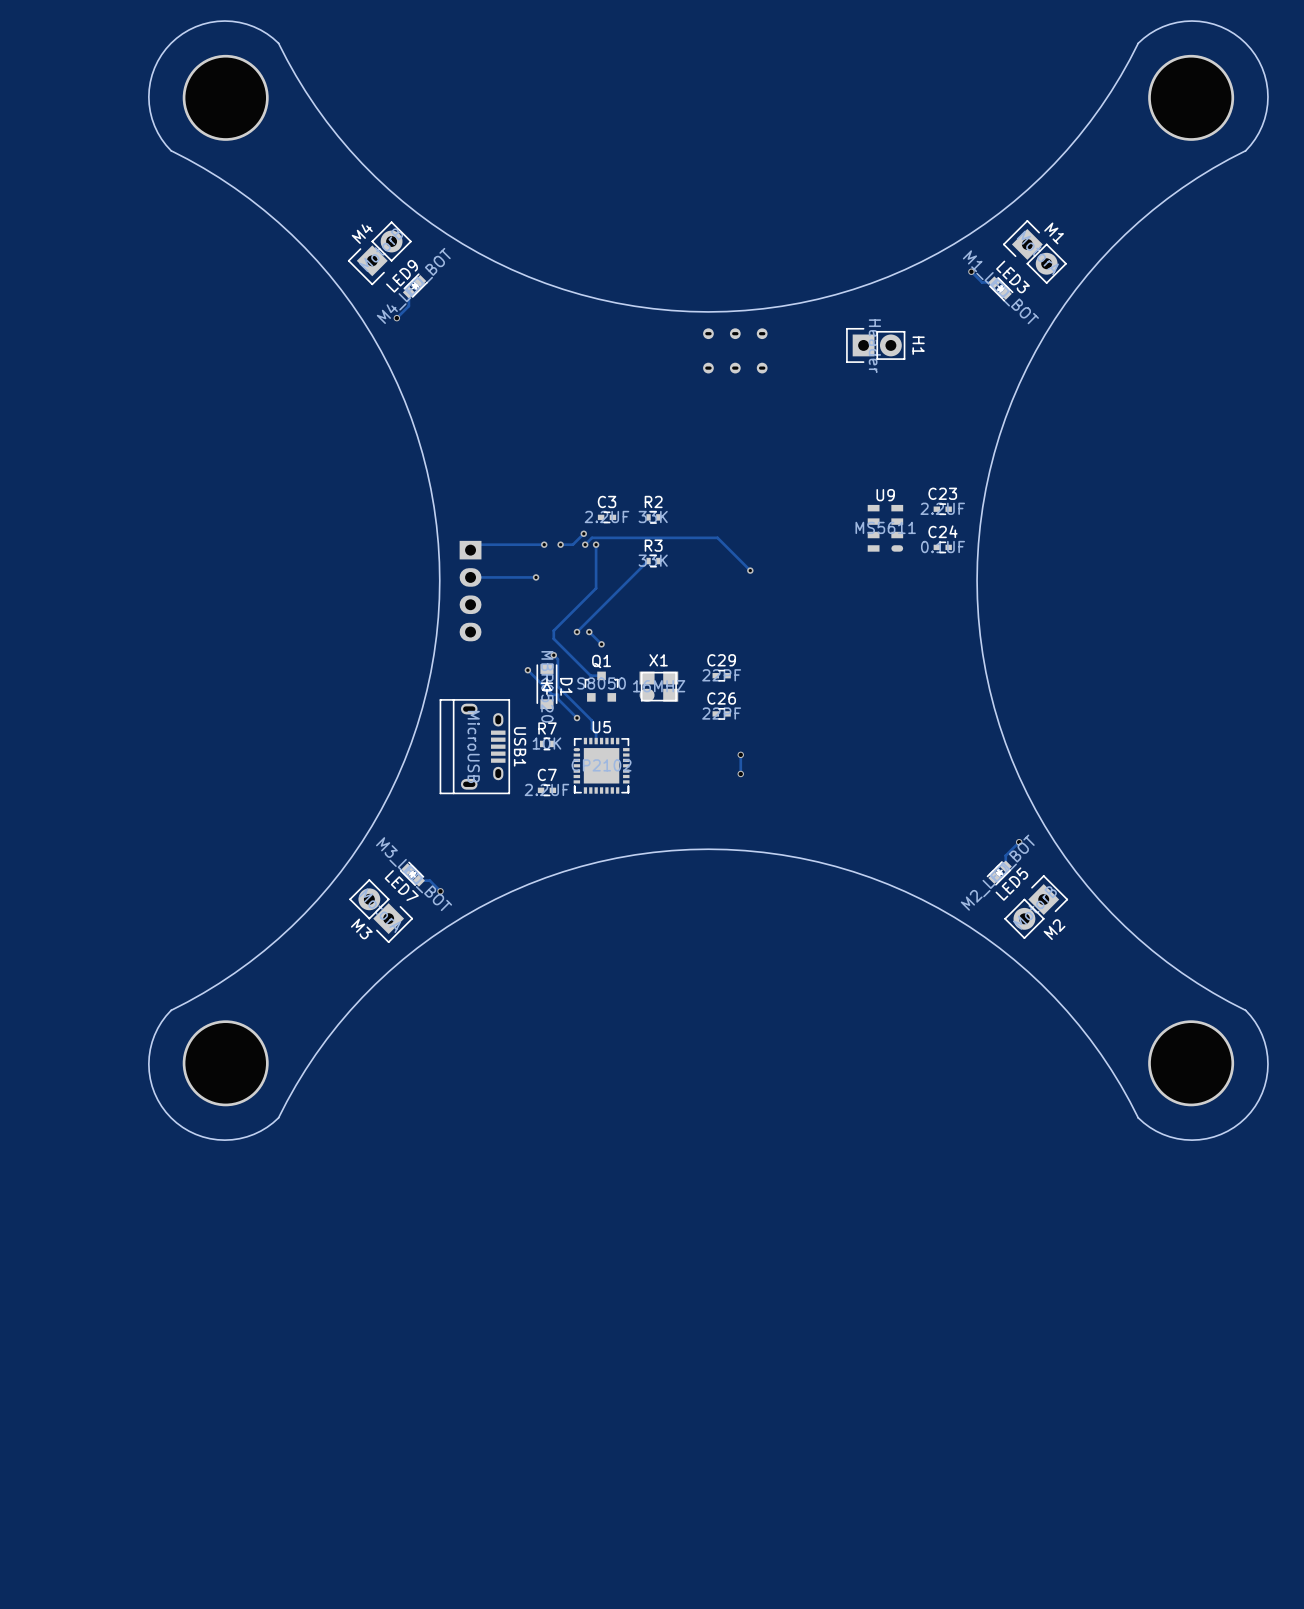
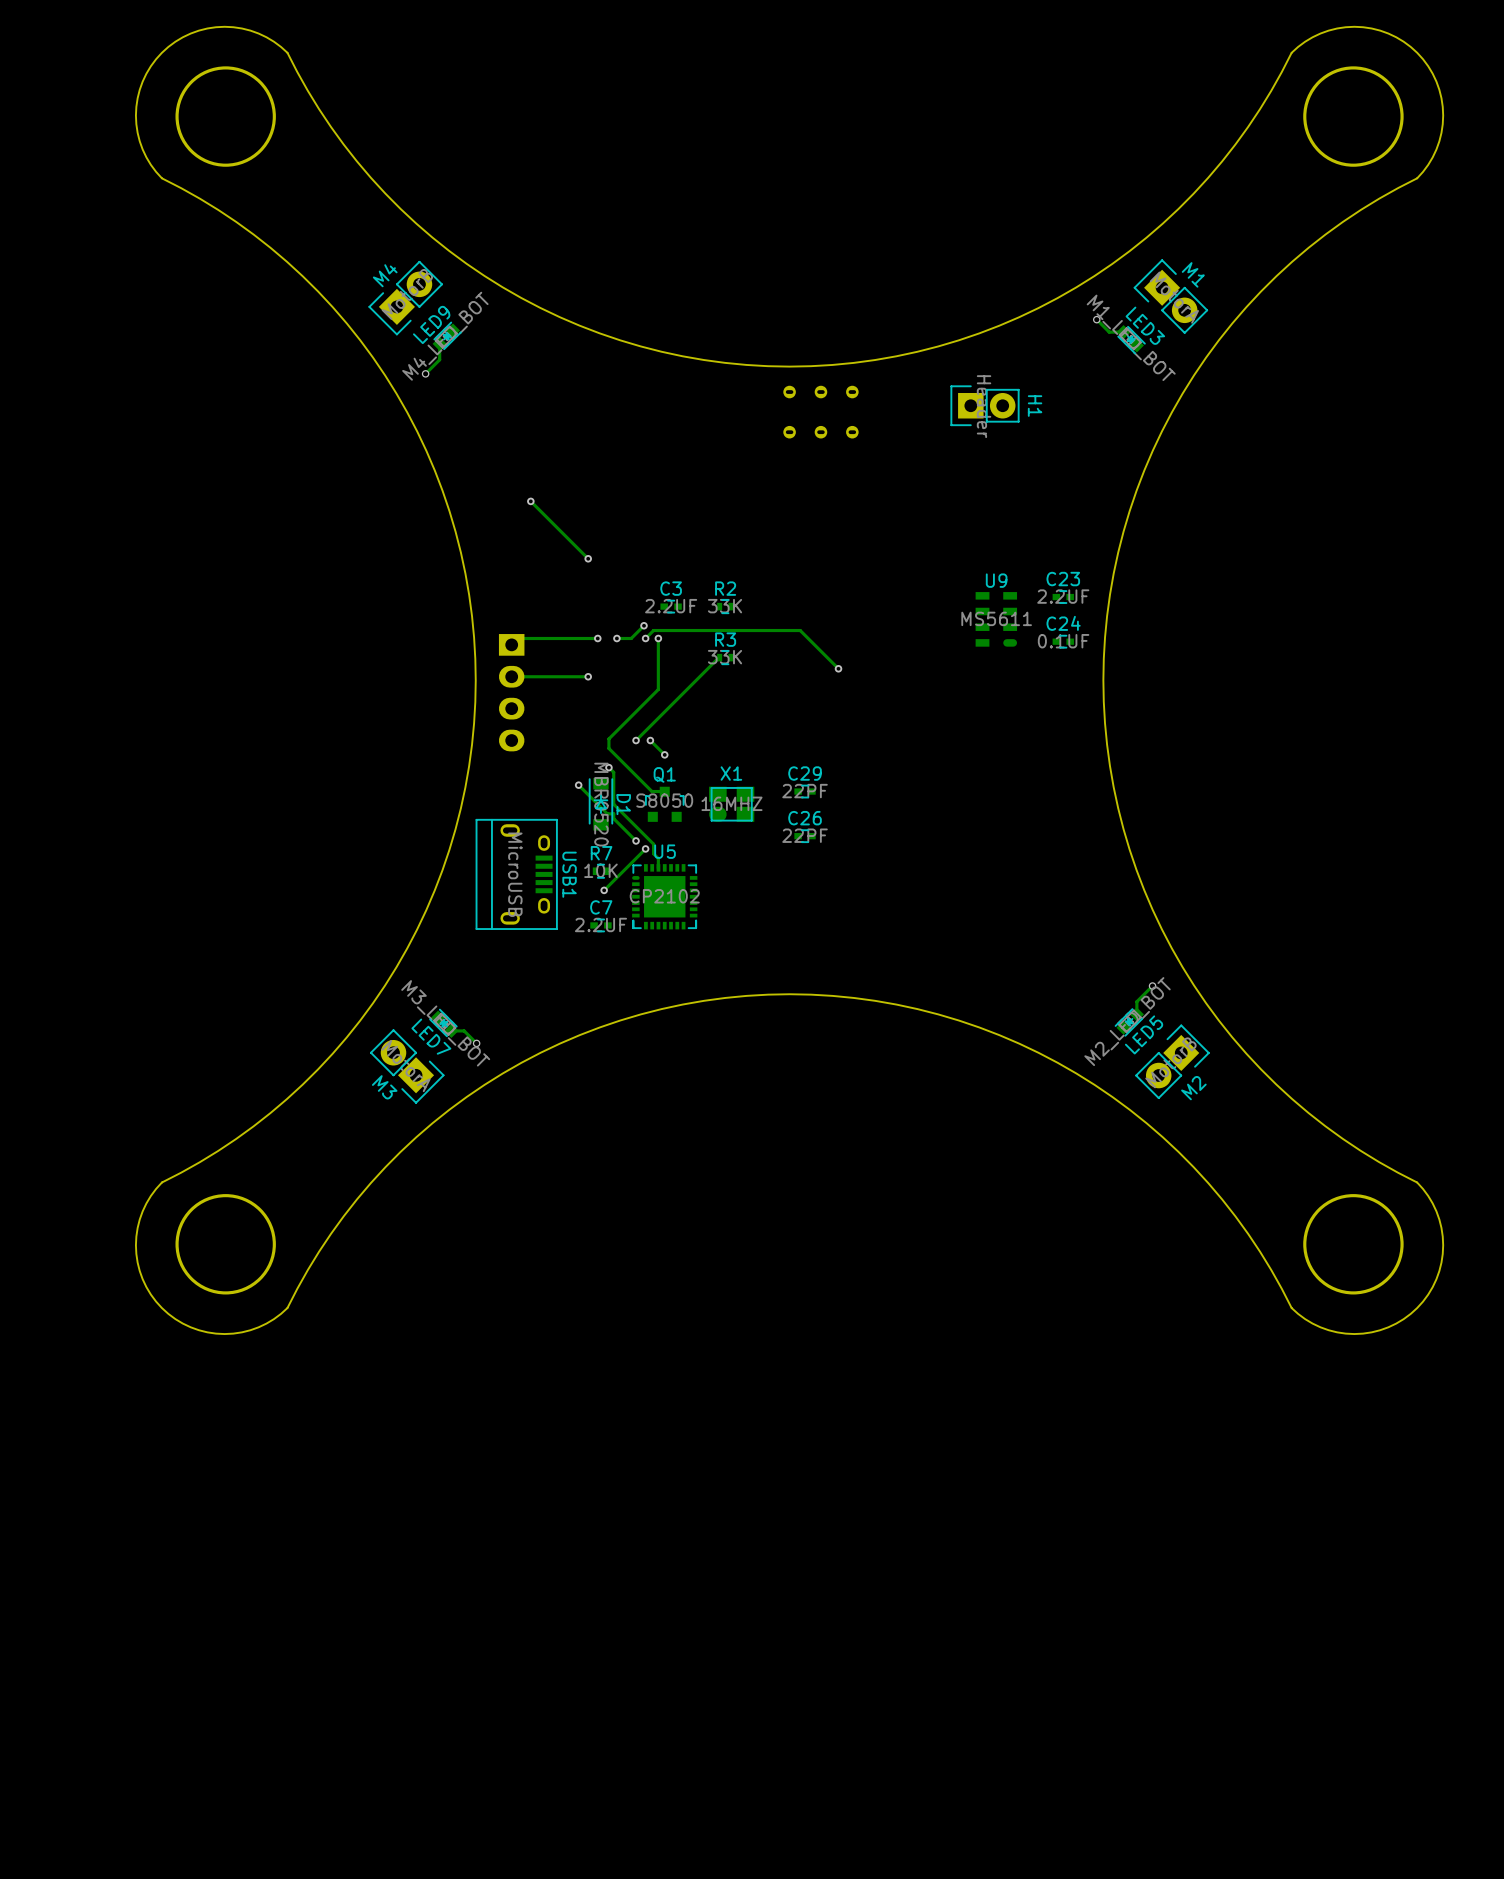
track: none -> (530, 501) (588, 558)
via: none -> (530, 501)
via: none -> (588, 558)
track: none -> (645, 848) (604, 890)
via: none -> (645, 848)
track: (740, 754) (740, 773) -> none
via: (740, 754) -> none
via: none -> (604, 890)
via: (740, 773) -> none

